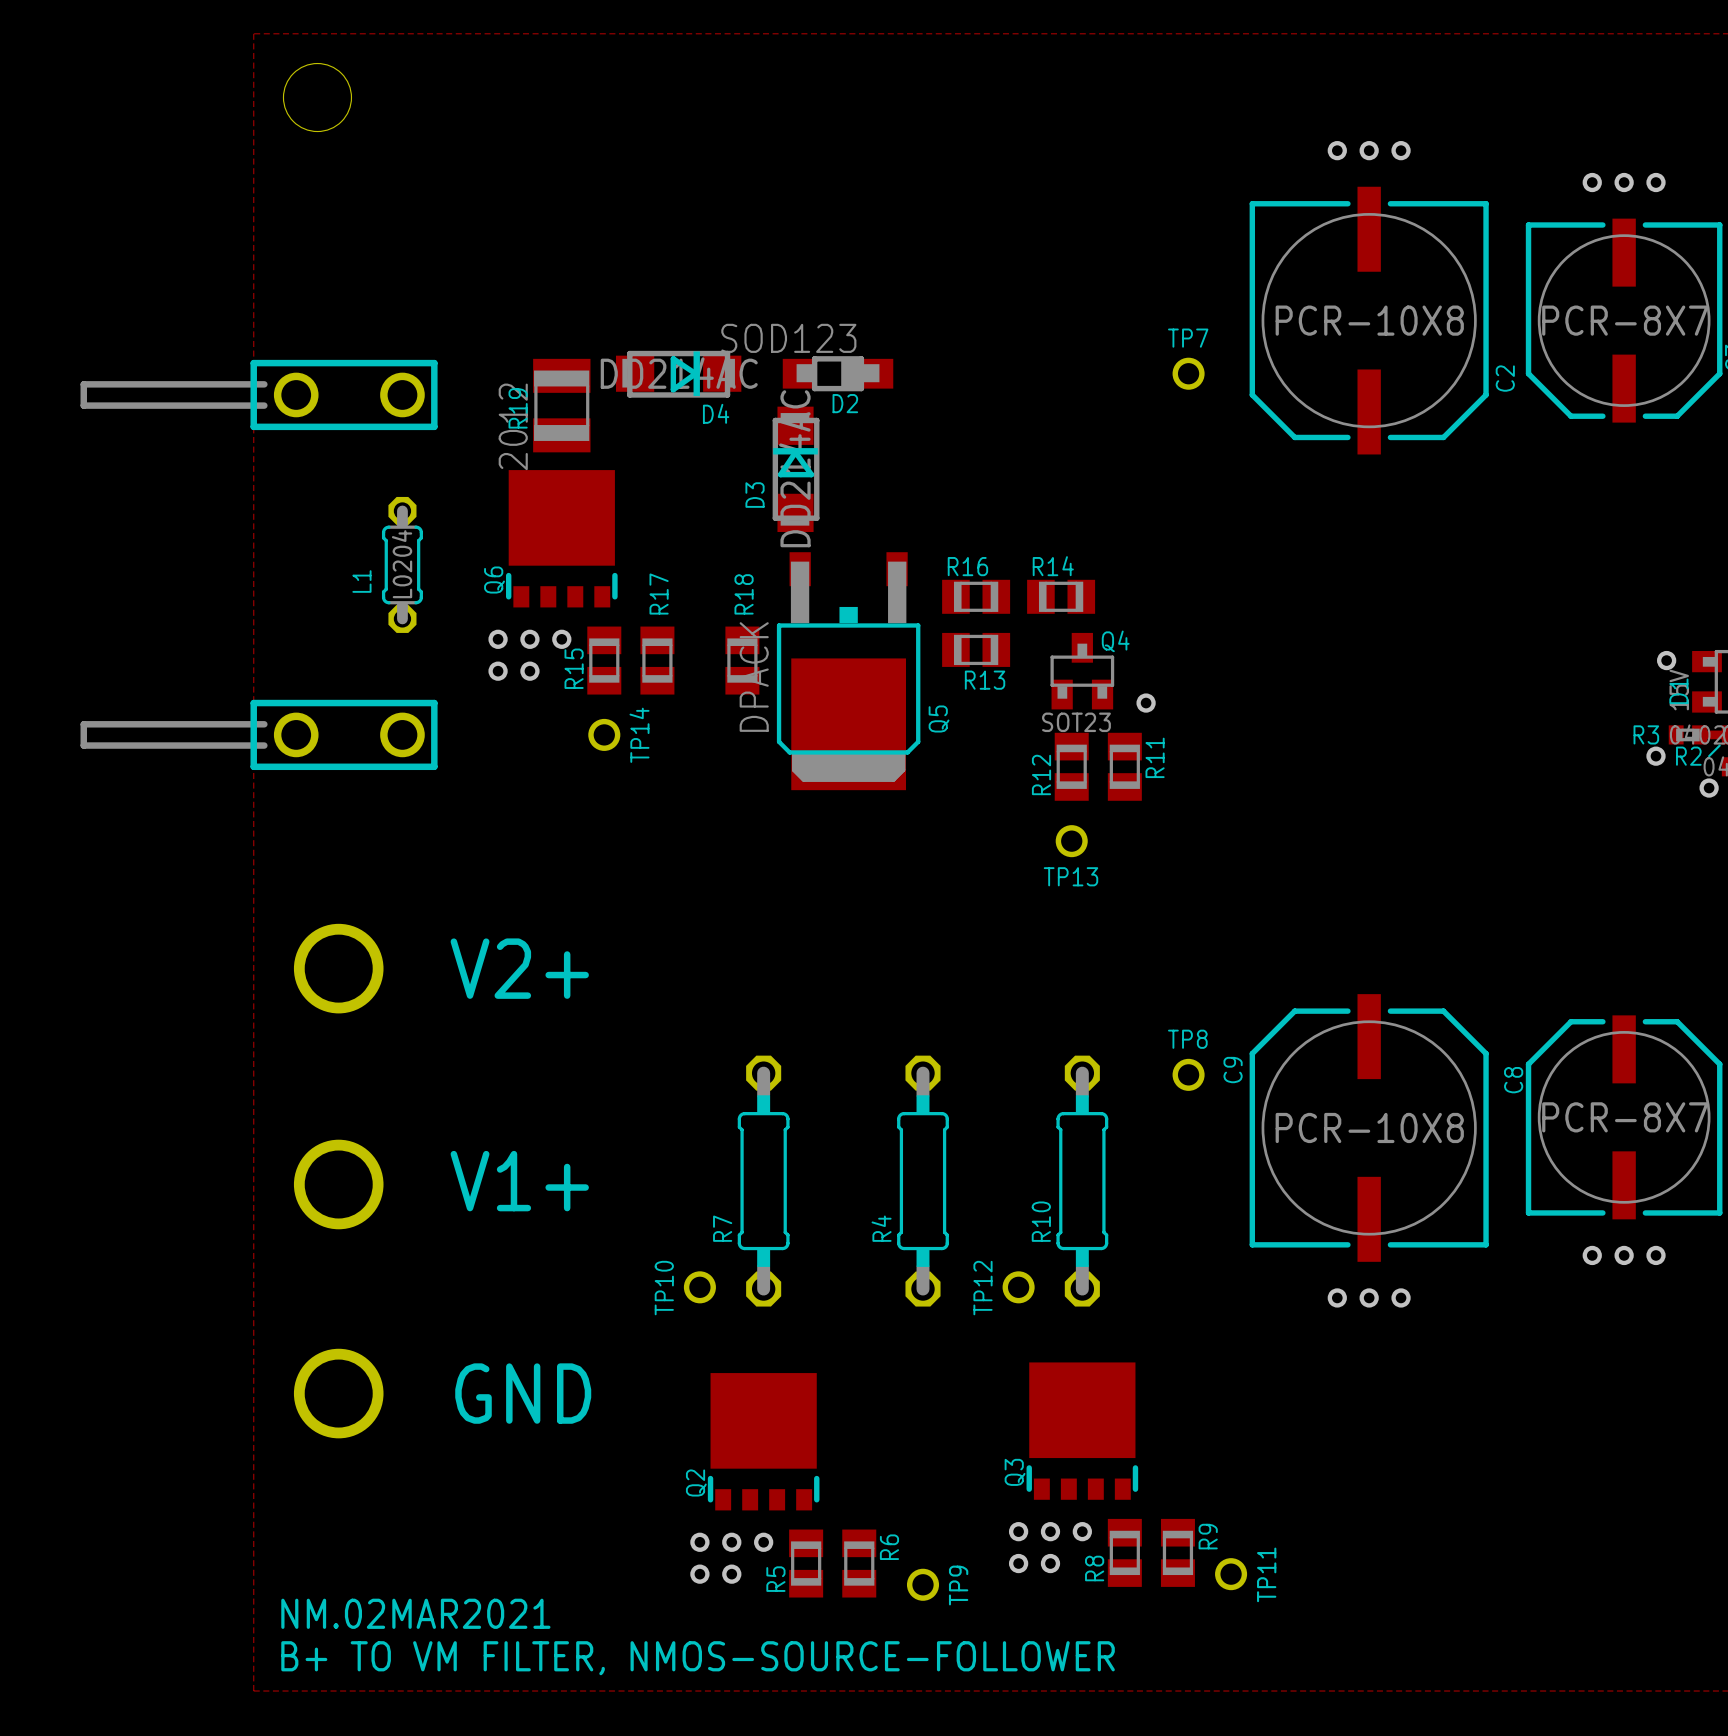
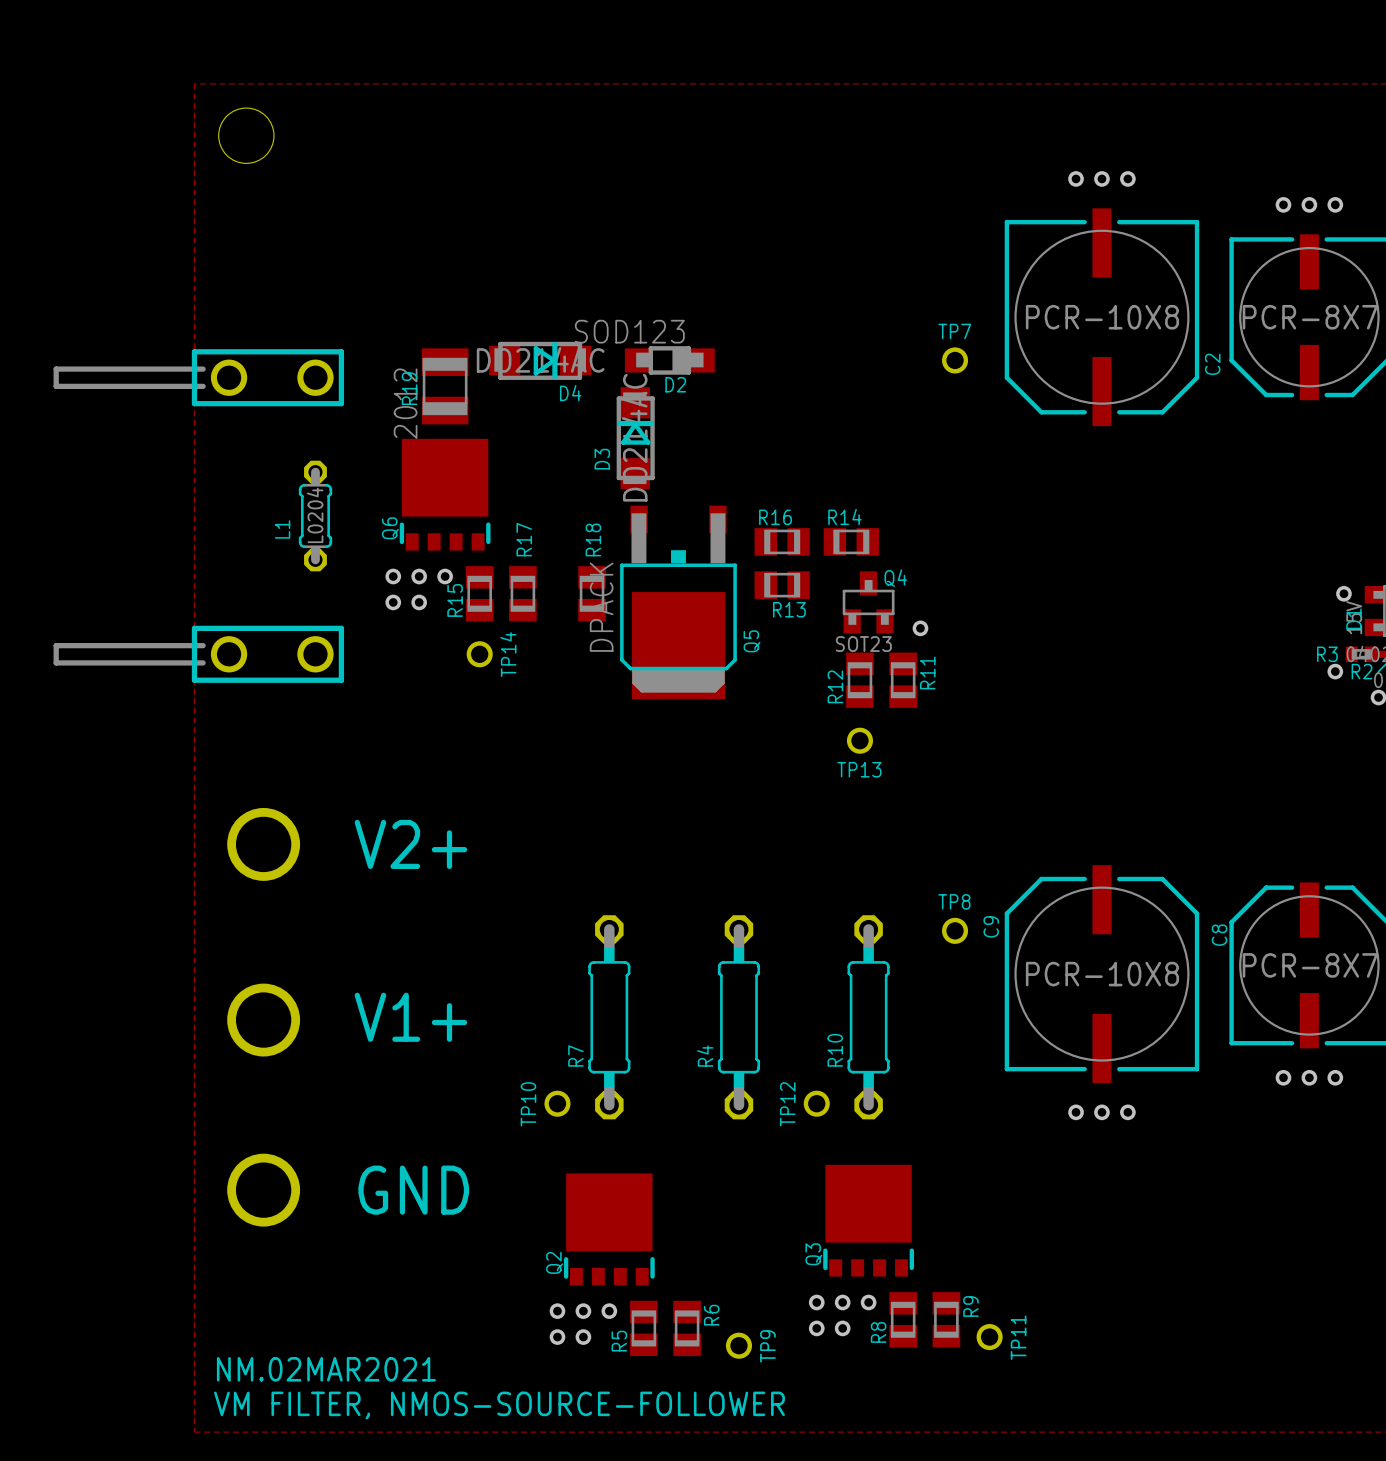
NM.02MAR2021 value: B+ TO VM FILTER, NMOS-SOURCE-FOLLOWER (698, 1658) -> VM FILTER, NMOS-SOURCE-FOLLOWER (499, 1405)

